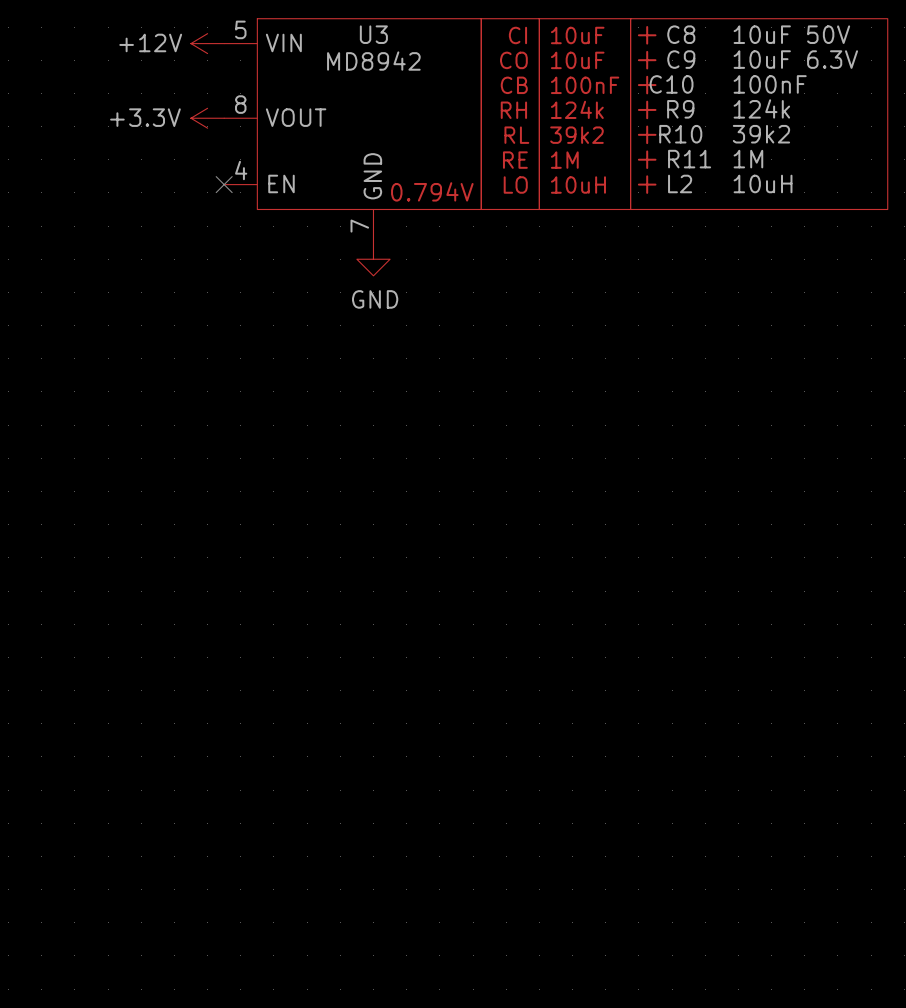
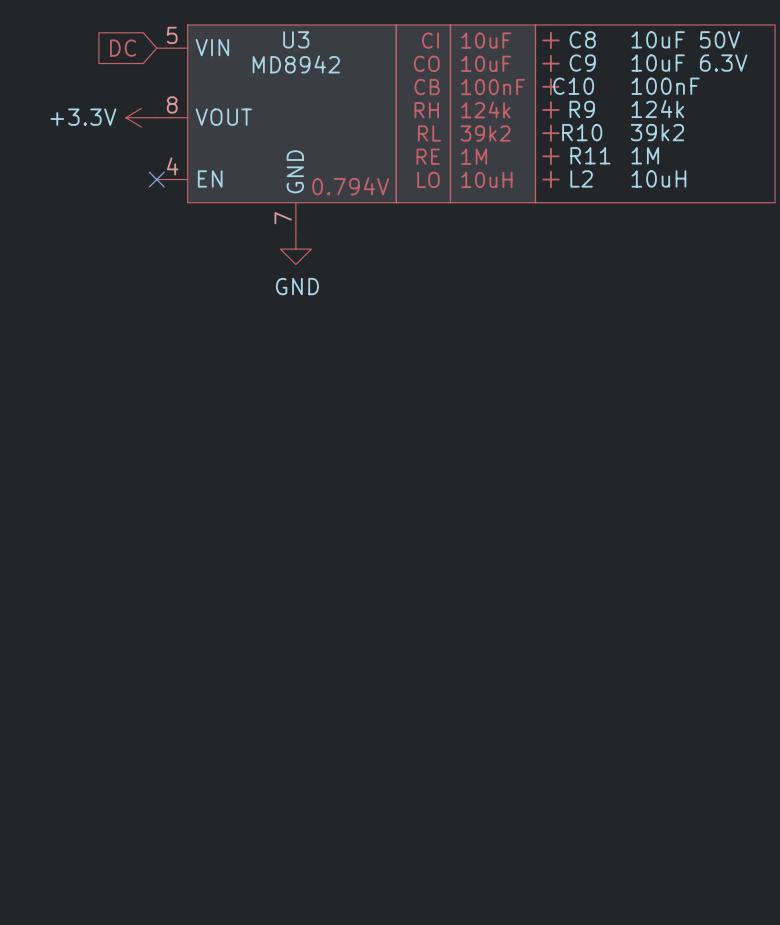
global label: none -> DC (123, 48)
power symbol: +12V (207, 43) -> none

